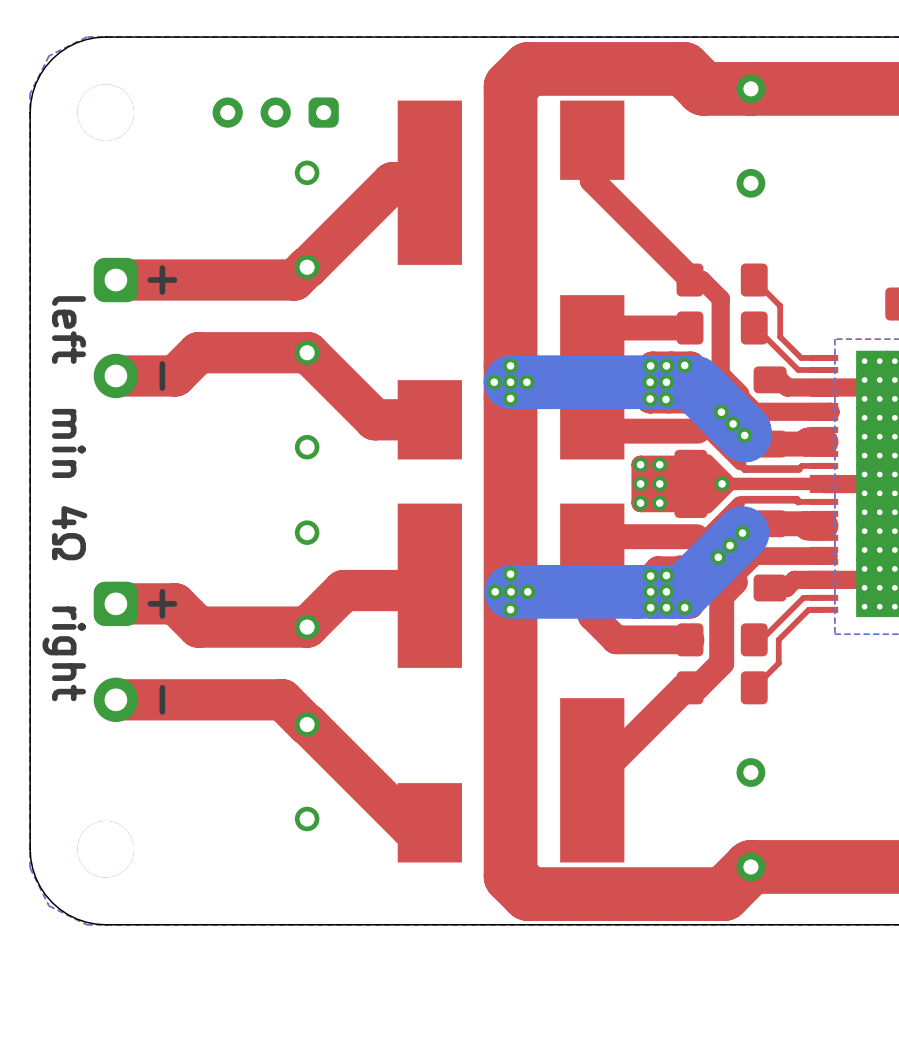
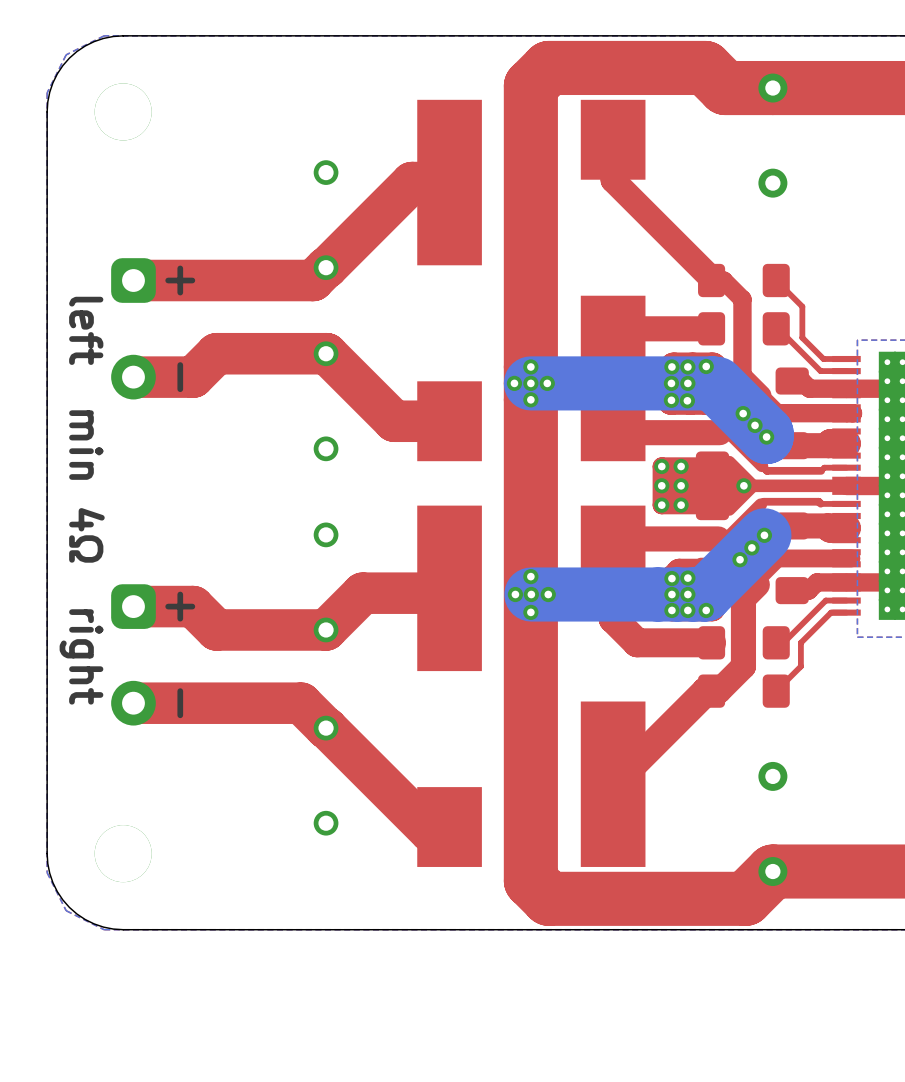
part: (275, 112) -> none

